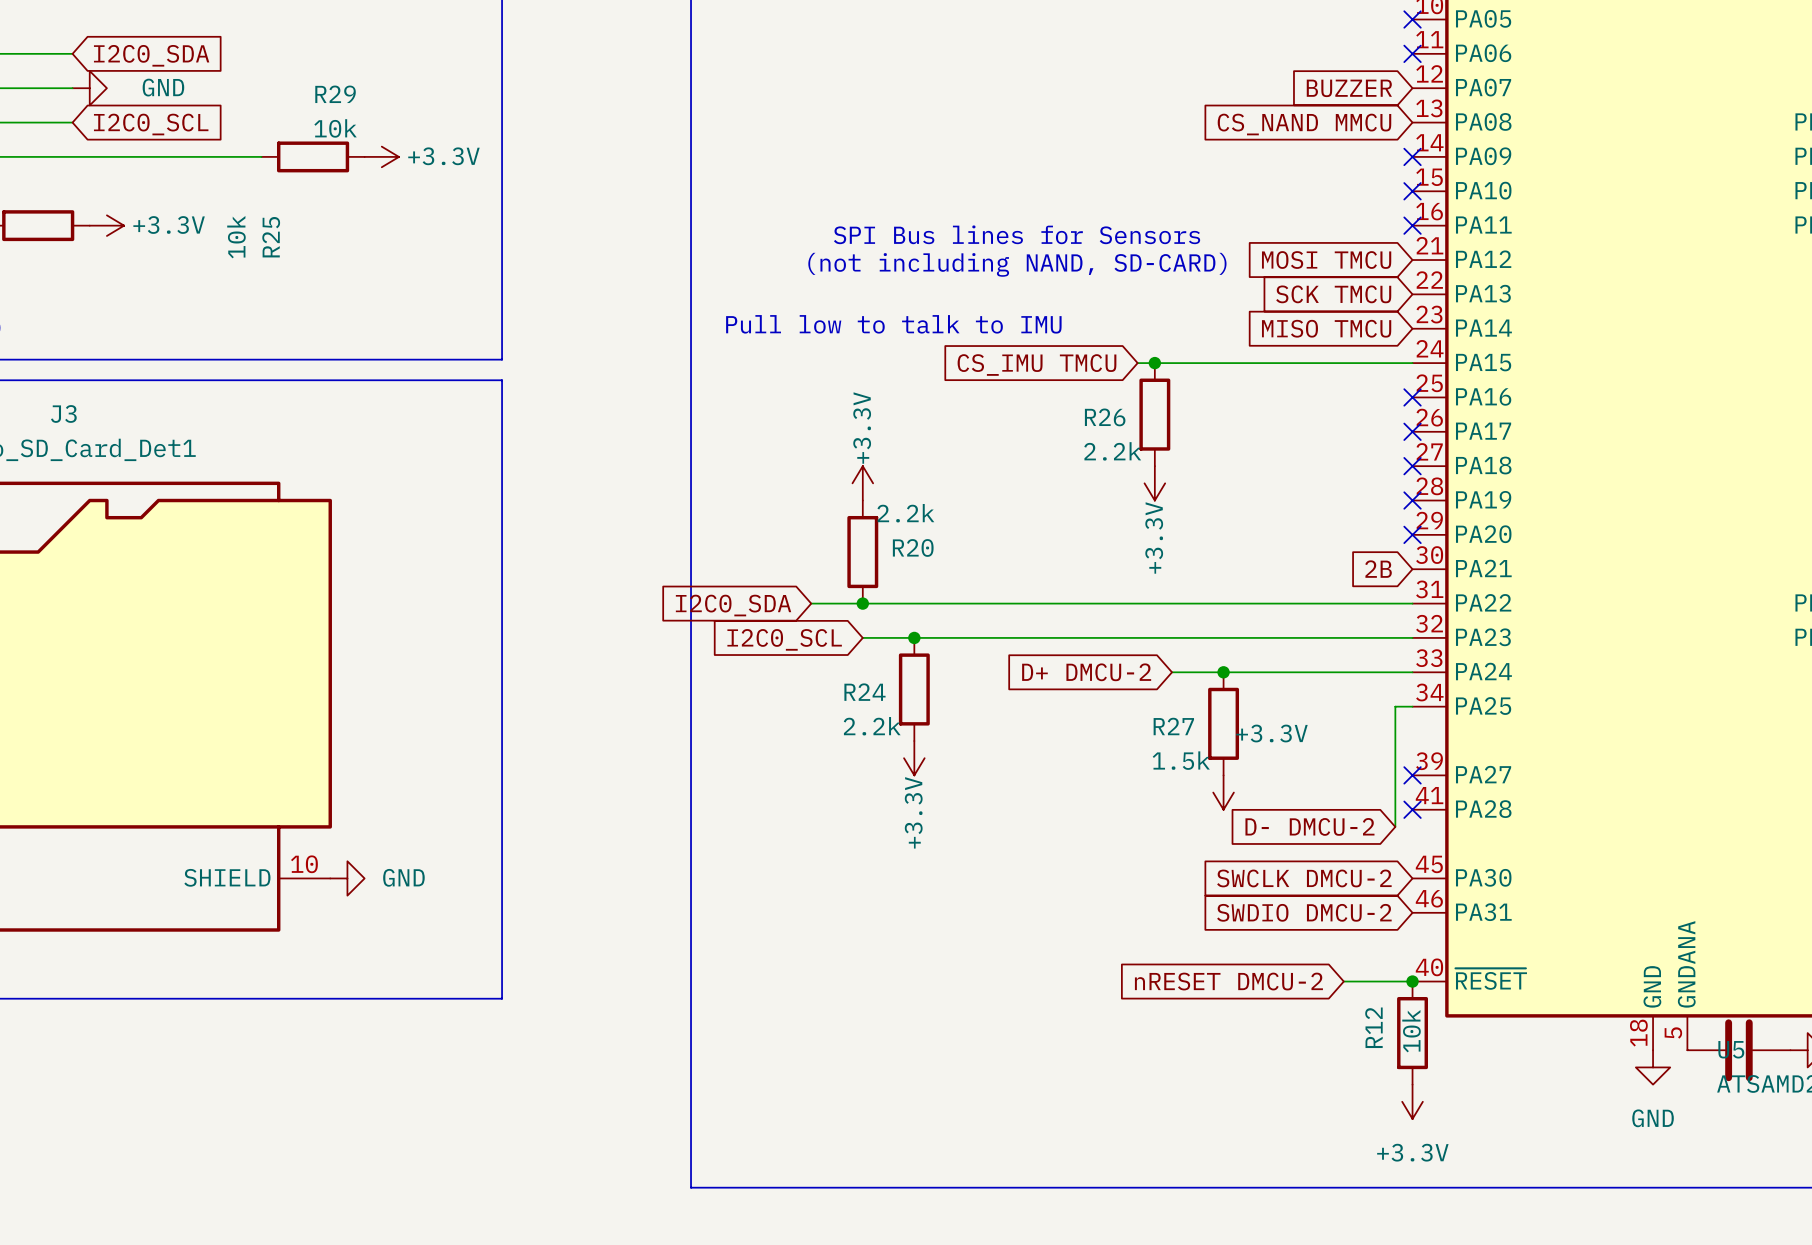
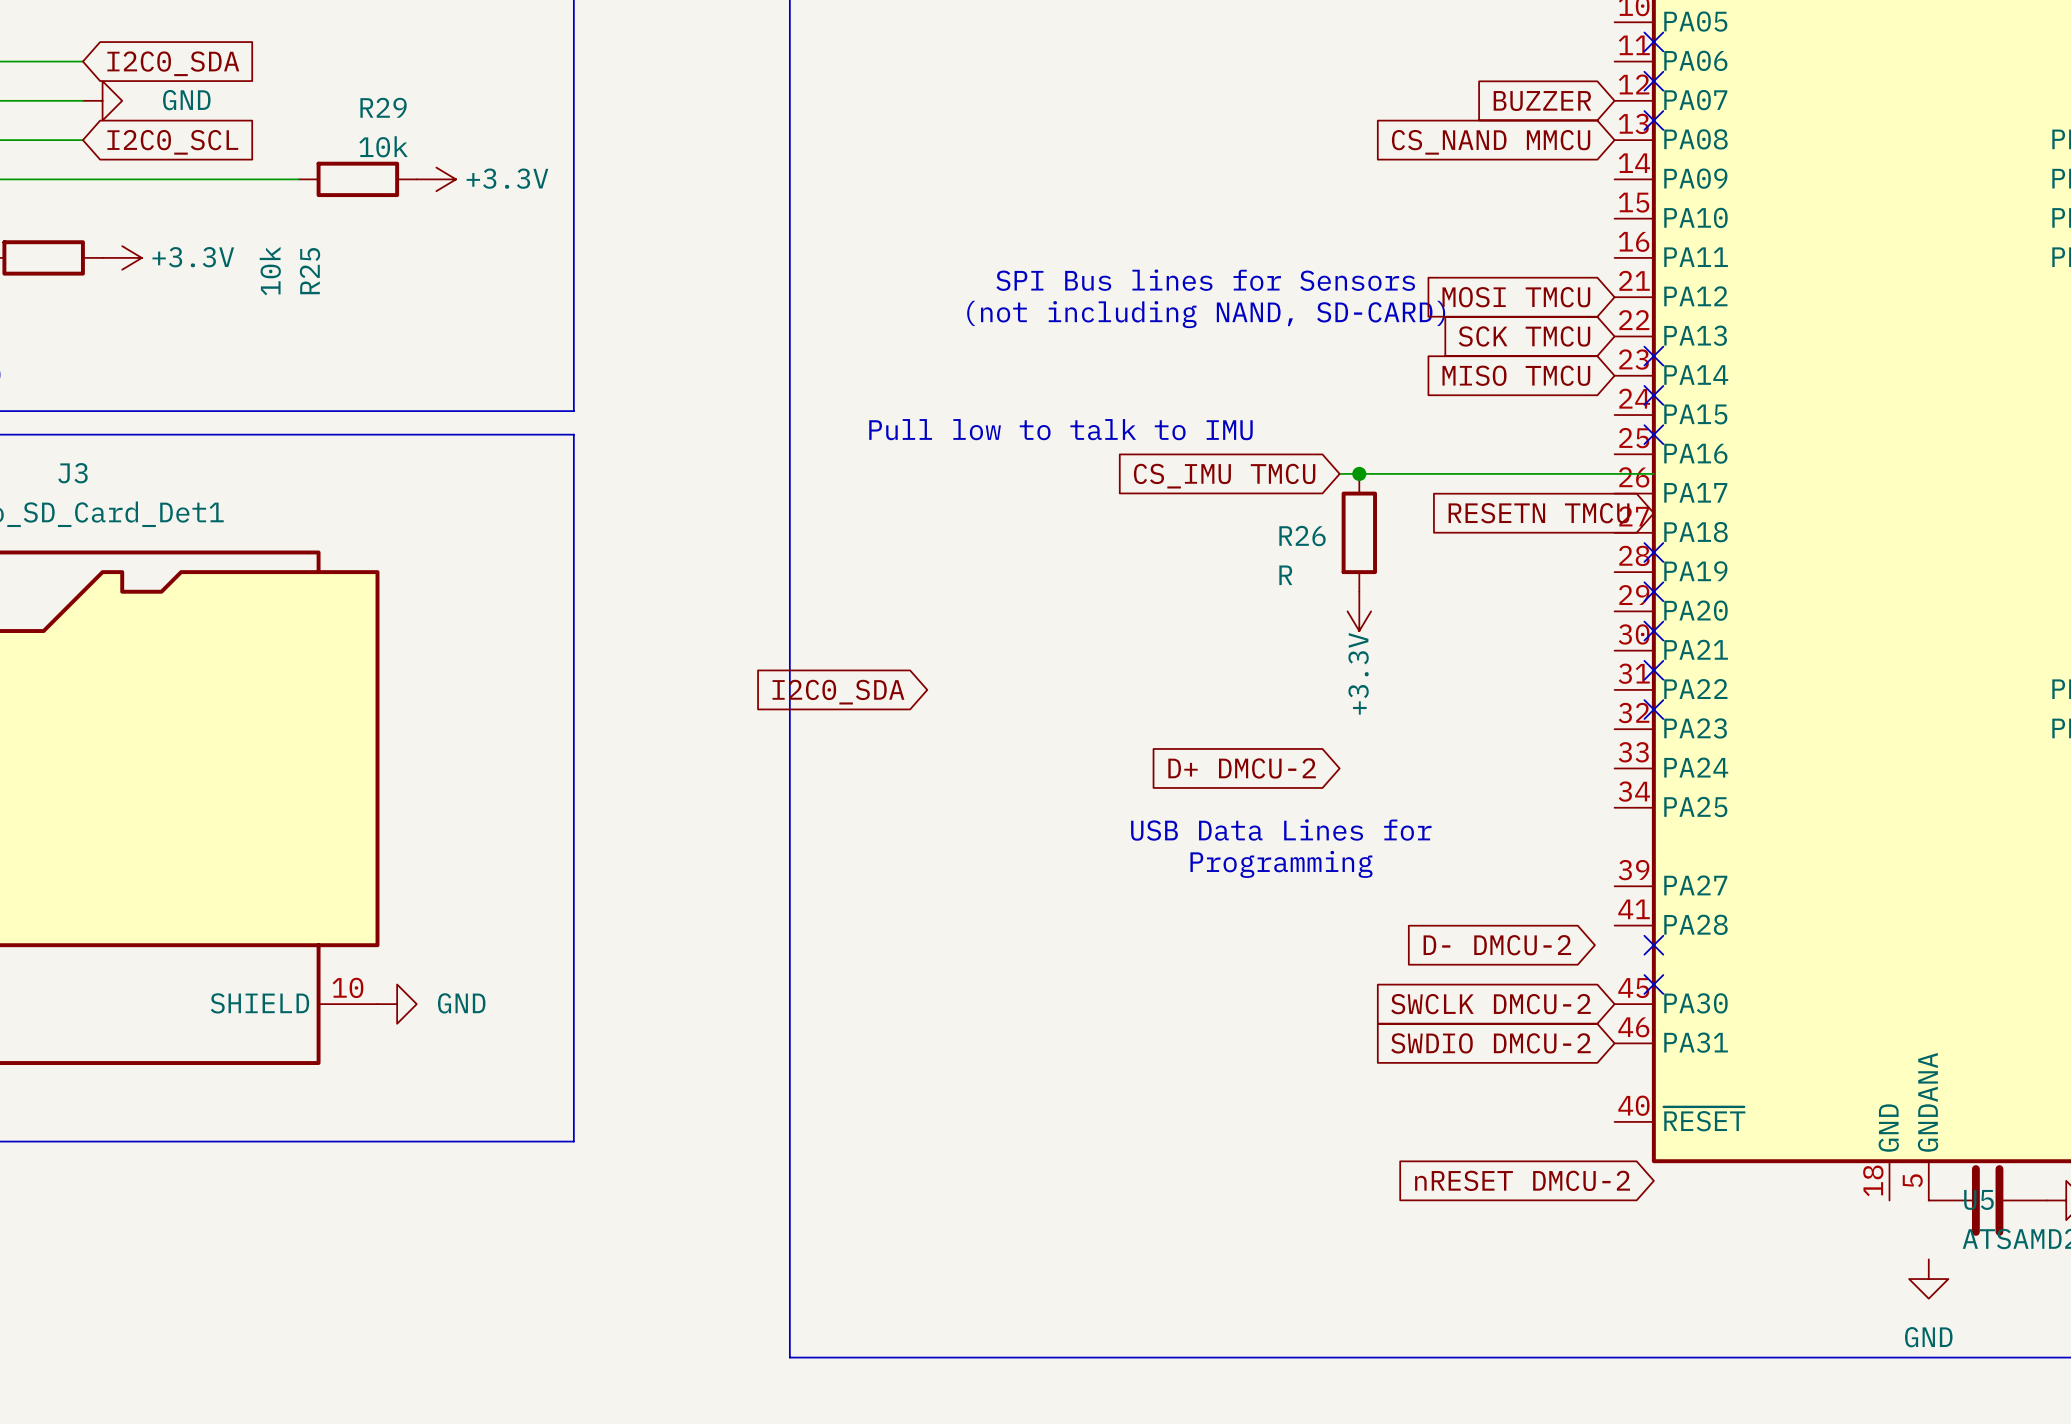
no-connect mark: (1412, 19) -> none
no-connect mark: none -> (1653, 41)
no-connect mark: (1412, 53) -> none
no-connect mark: none -> (1653, 81)
no-connect mark: none -> (1653, 120)
no-connect mark: (1412, 156) -> none
no-connect mark: (1412, 191) -> none
no-connect mark: (1412, 225) -> none
text position: SPI Bus lines for Sensors (1017, 234) -> SPI Bus lines for Sensors (1205, 280)
text position: (not including NAND, SD-CARD) (1017, 264) -> (not including NAND, SD-CARD) (1206, 314)
no-connect mark: none -> (1653, 356)
text position: Pull low to talk to IMU (893, 324) -> Pull low to talk to IMU (1060, 429)
no-connect mark: none -> (1653, 395)
wire: (1137, 363) (1412, 363) -> (1339, 473) (1653, 473)
junction position: (1154, 363) -> (1359, 473)
global label position: CS_IMU TMCU (1036, 365) -> CS_IMU TMCU (1224, 476)
no-connect mark: none -> (1653, 434)
no-connect mark: (1412, 397) -> none
R26 position: (1154, 414) -> (1359, 532)
no-connect mark: (1412, 431) -> none
global label: none -> RESETN TMCU (1539, 513)
R26 value: 2.2k (1112, 451) -> R (1285, 575)
no-connect mark: (1412, 466) -> none
power symbol: +3.3V (862, 483) -> none
power symbol position: +3.3V (1154, 483) -> +3.3V (1359, 611)
no-connect mark: none -> (1653, 552)
no-connect mark: (1412, 500) -> none
no-connect mark: none -> (1653, 591)
no-connect mark: (1412, 534) -> none
R20: 2.2k (862, 552) -> none
no-connect mark: none -> (1653, 631)
global label: 2B (1378, 569) -> none
no-connect mark: none -> (1653, 670)
wire: (811, 603) (1412, 603) -> none
junction: (862, 603) -> none
no-connect mark: none -> (1653, 709)
wire: (862, 637) (1412, 637) -> none
junction: (914, 637) -> none
global label: I2C0_SCL (784, 639) -> none
wire: (1172, 672) (1412, 672) -> none
junction: (1223, 672) -> none
R24: 2.2k (914, 689) -> none
wire: (1412, 706) (1395, 706) (1395, 826) -> none
R27: 1.5k (1223, 723) -> none
text: none -> USB Data Lines for (1281, 830)
text: none -> Programming (1281, 864)
power symbol: +3.3V (914, 758) -> none
no-connect mark: (1412, 775) -> none
power symbol: +3.3V (1223, 792) -> none
no-connect mark: (1412, 809) -> none
no-connect mark: none -> (1653, 945)
no-connect mark: none -> (1653, 984)
global label position: nRESET DMCU-2 (1228, 981) -> nRESET DMCU-2 (1522, 1180)
wire: (1343, 981) (1412, 981) -> none
junction: (1412, 981) -> none
R12: 10k (1412, 1033) -> none
power symbol position: GND (1653, 1067) -> GND (1928, 1279)
power symbol: +3.3V (1412, 1101) -> none

